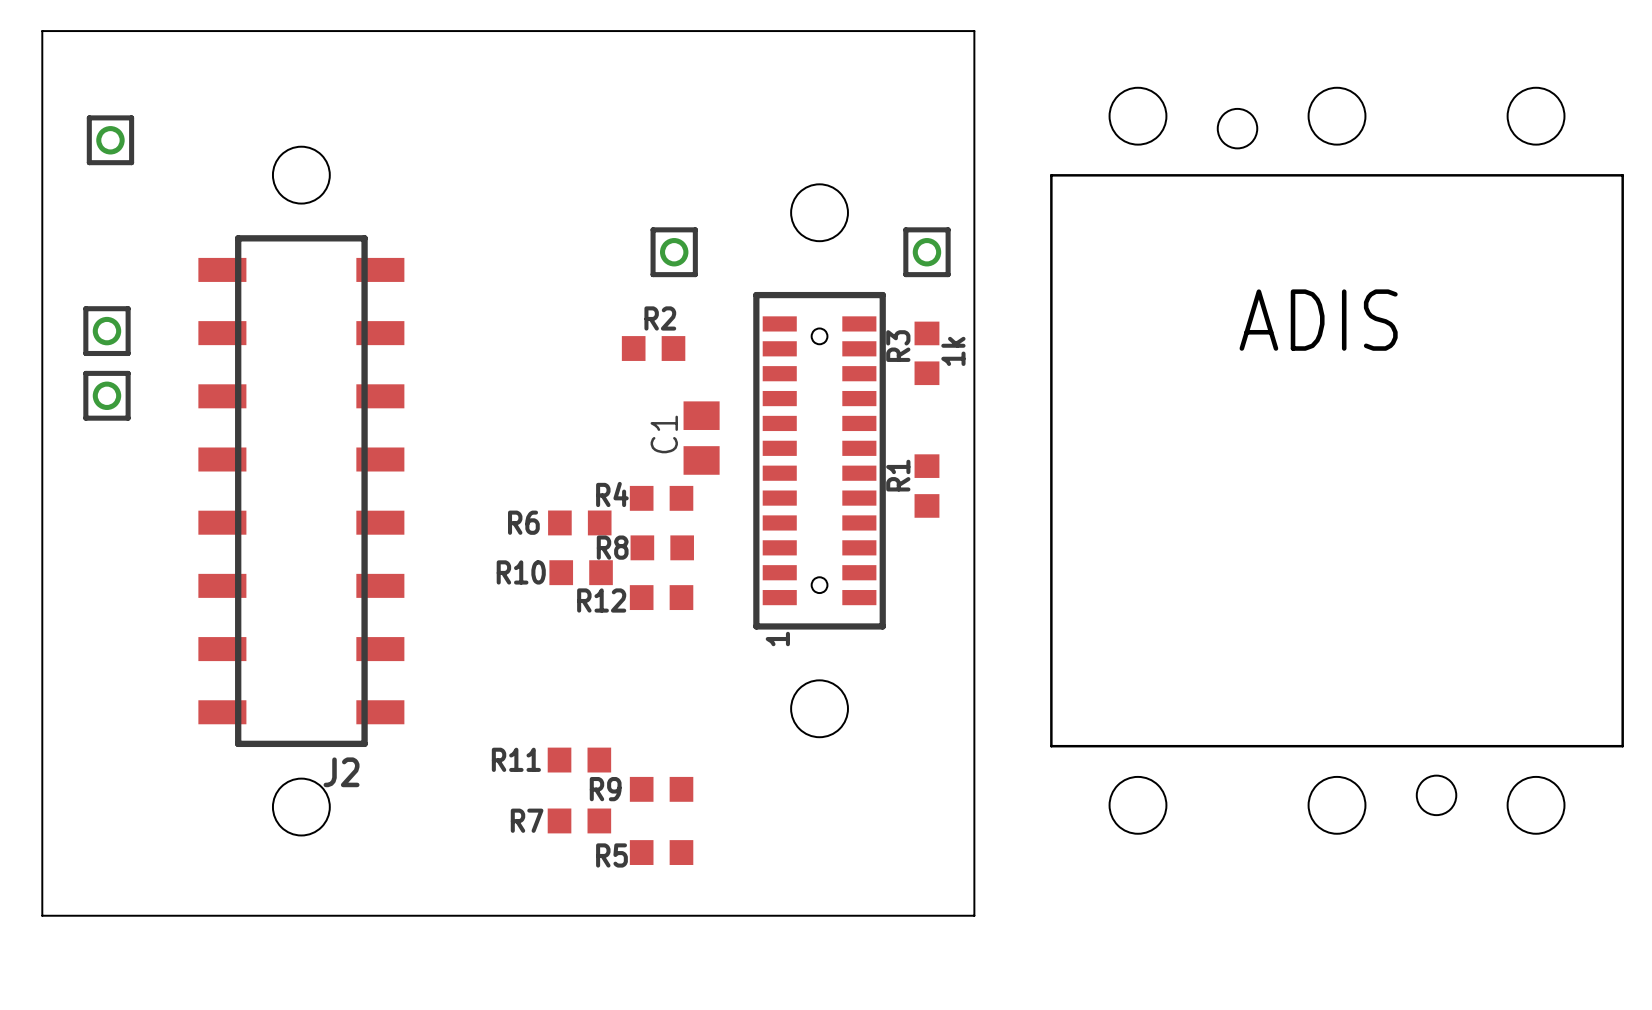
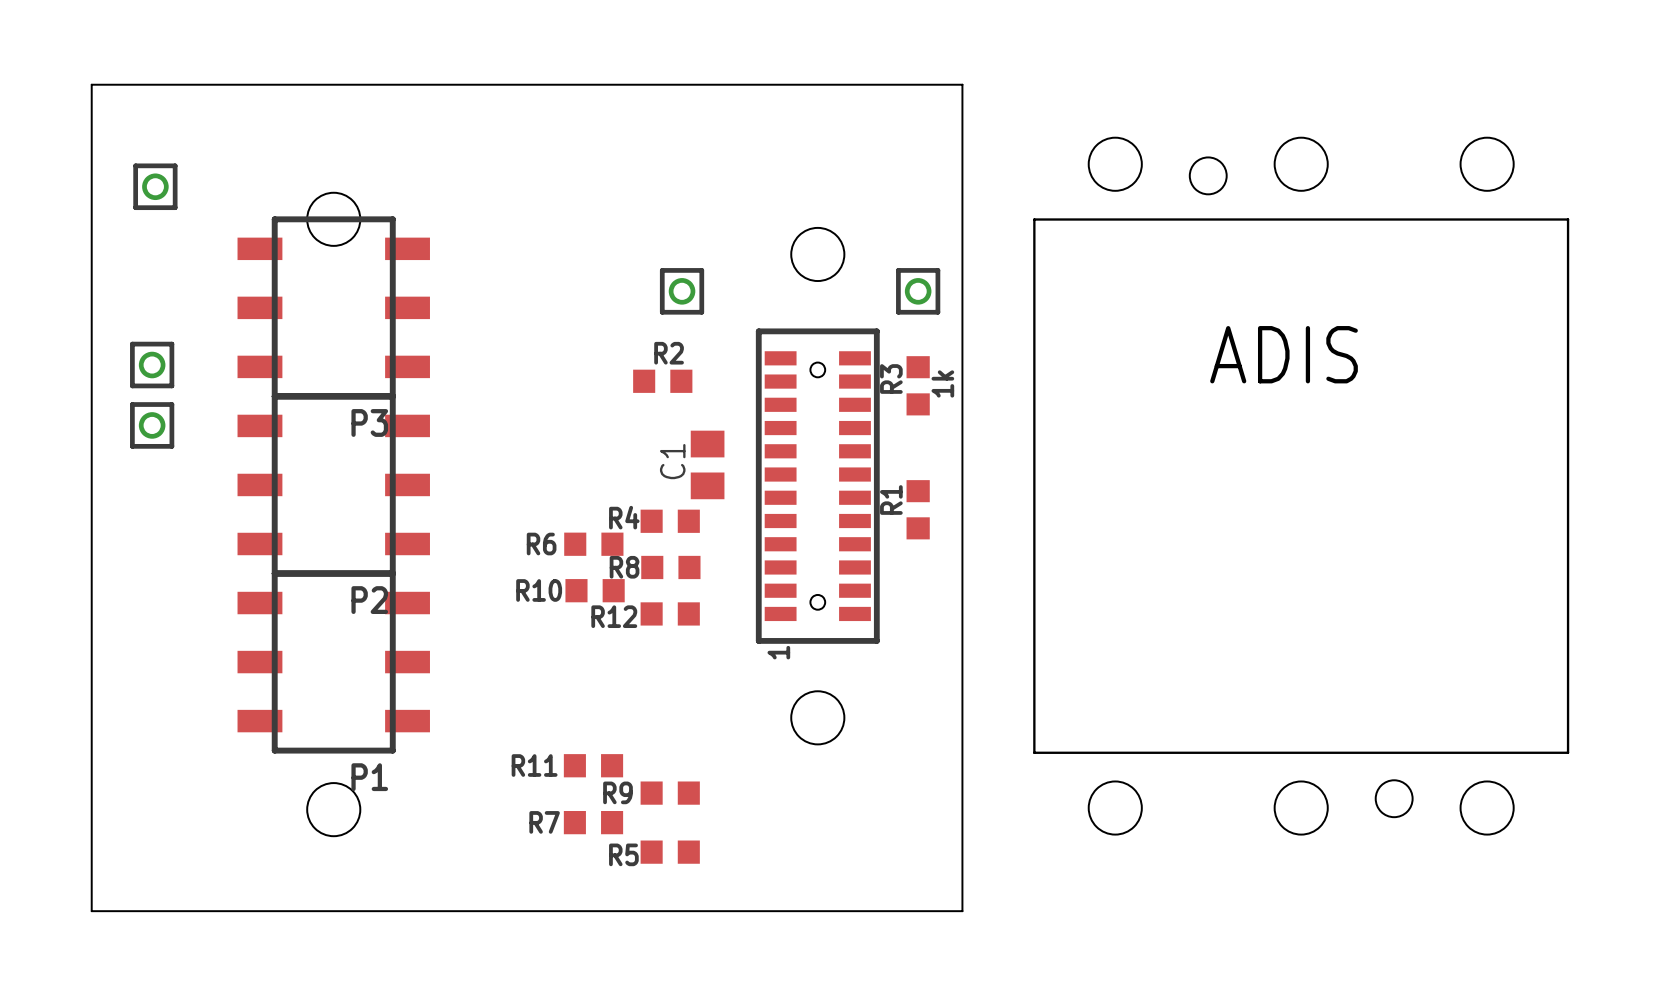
P3: none -> (333, 307)
P2: none -> (333, 484)
J2: (301, 491) -> none
P1: none -> (333, 662)

